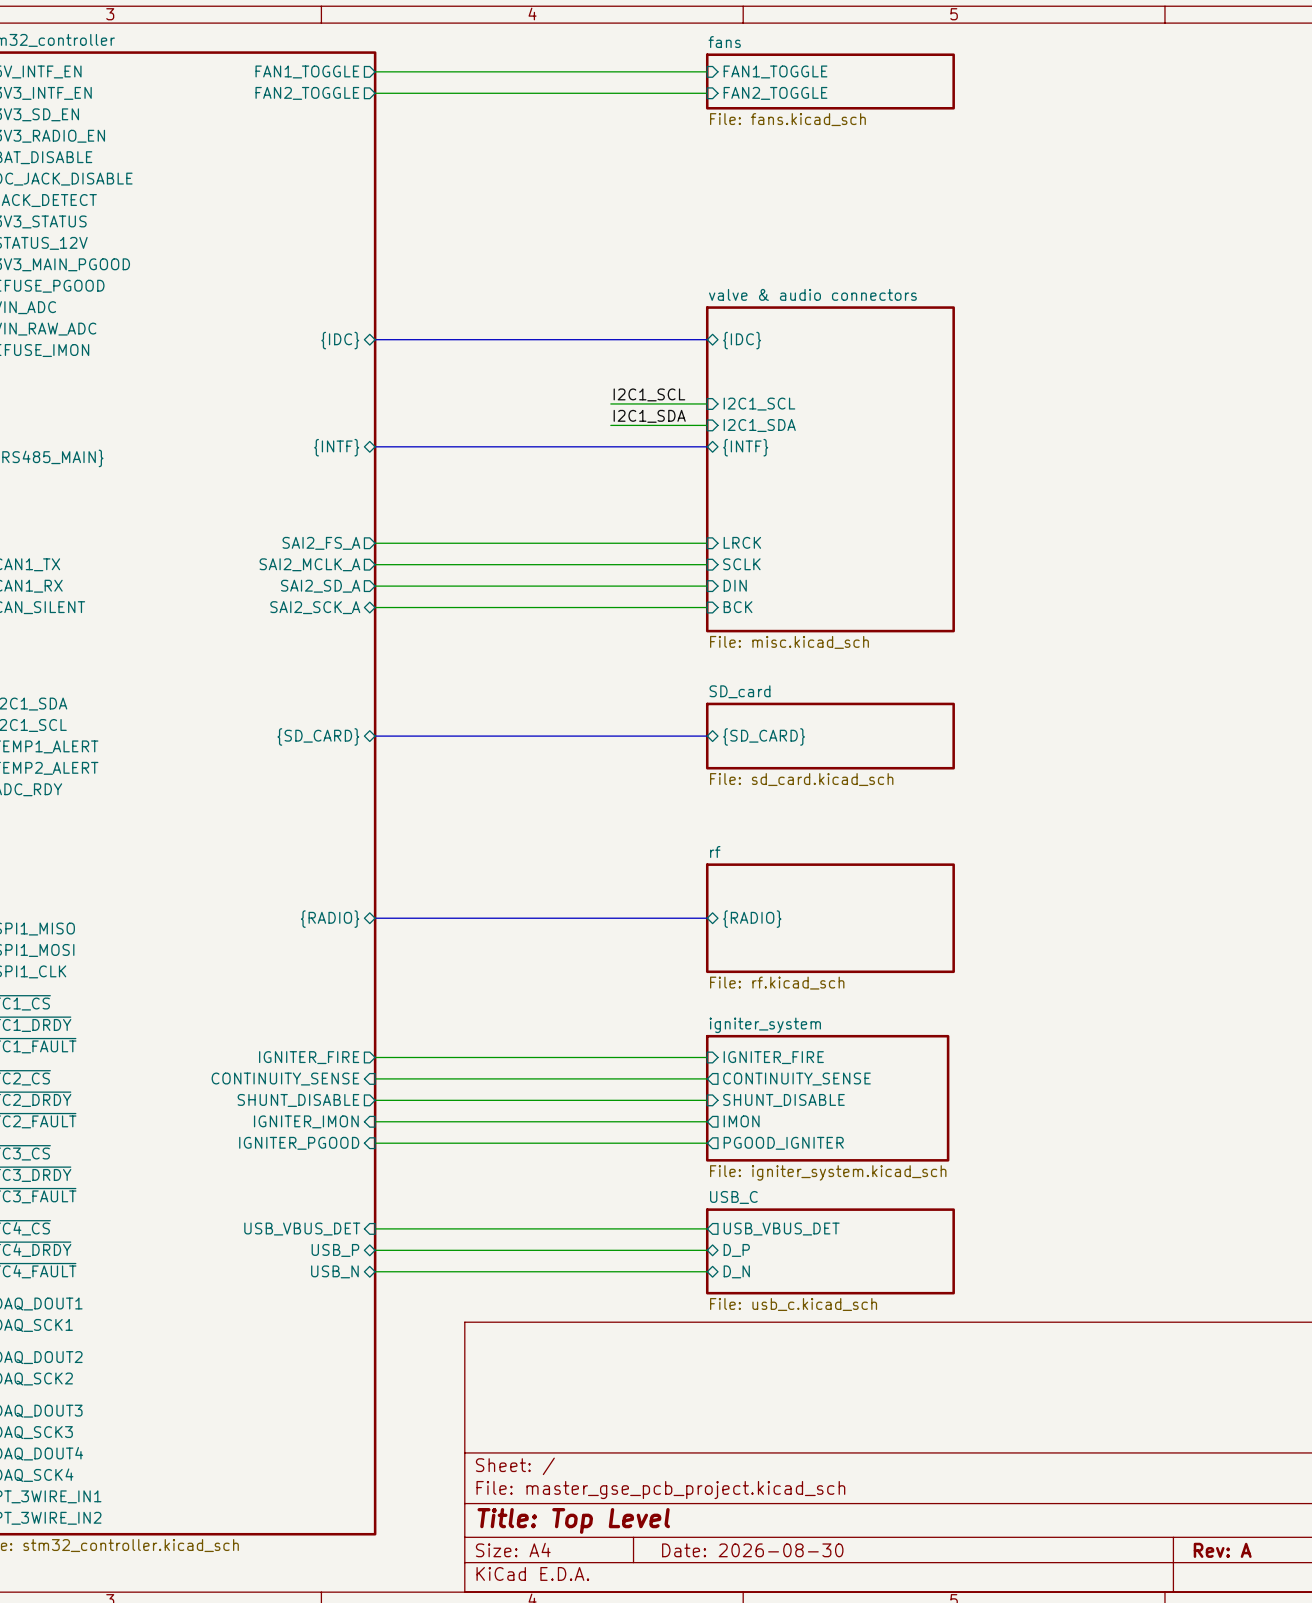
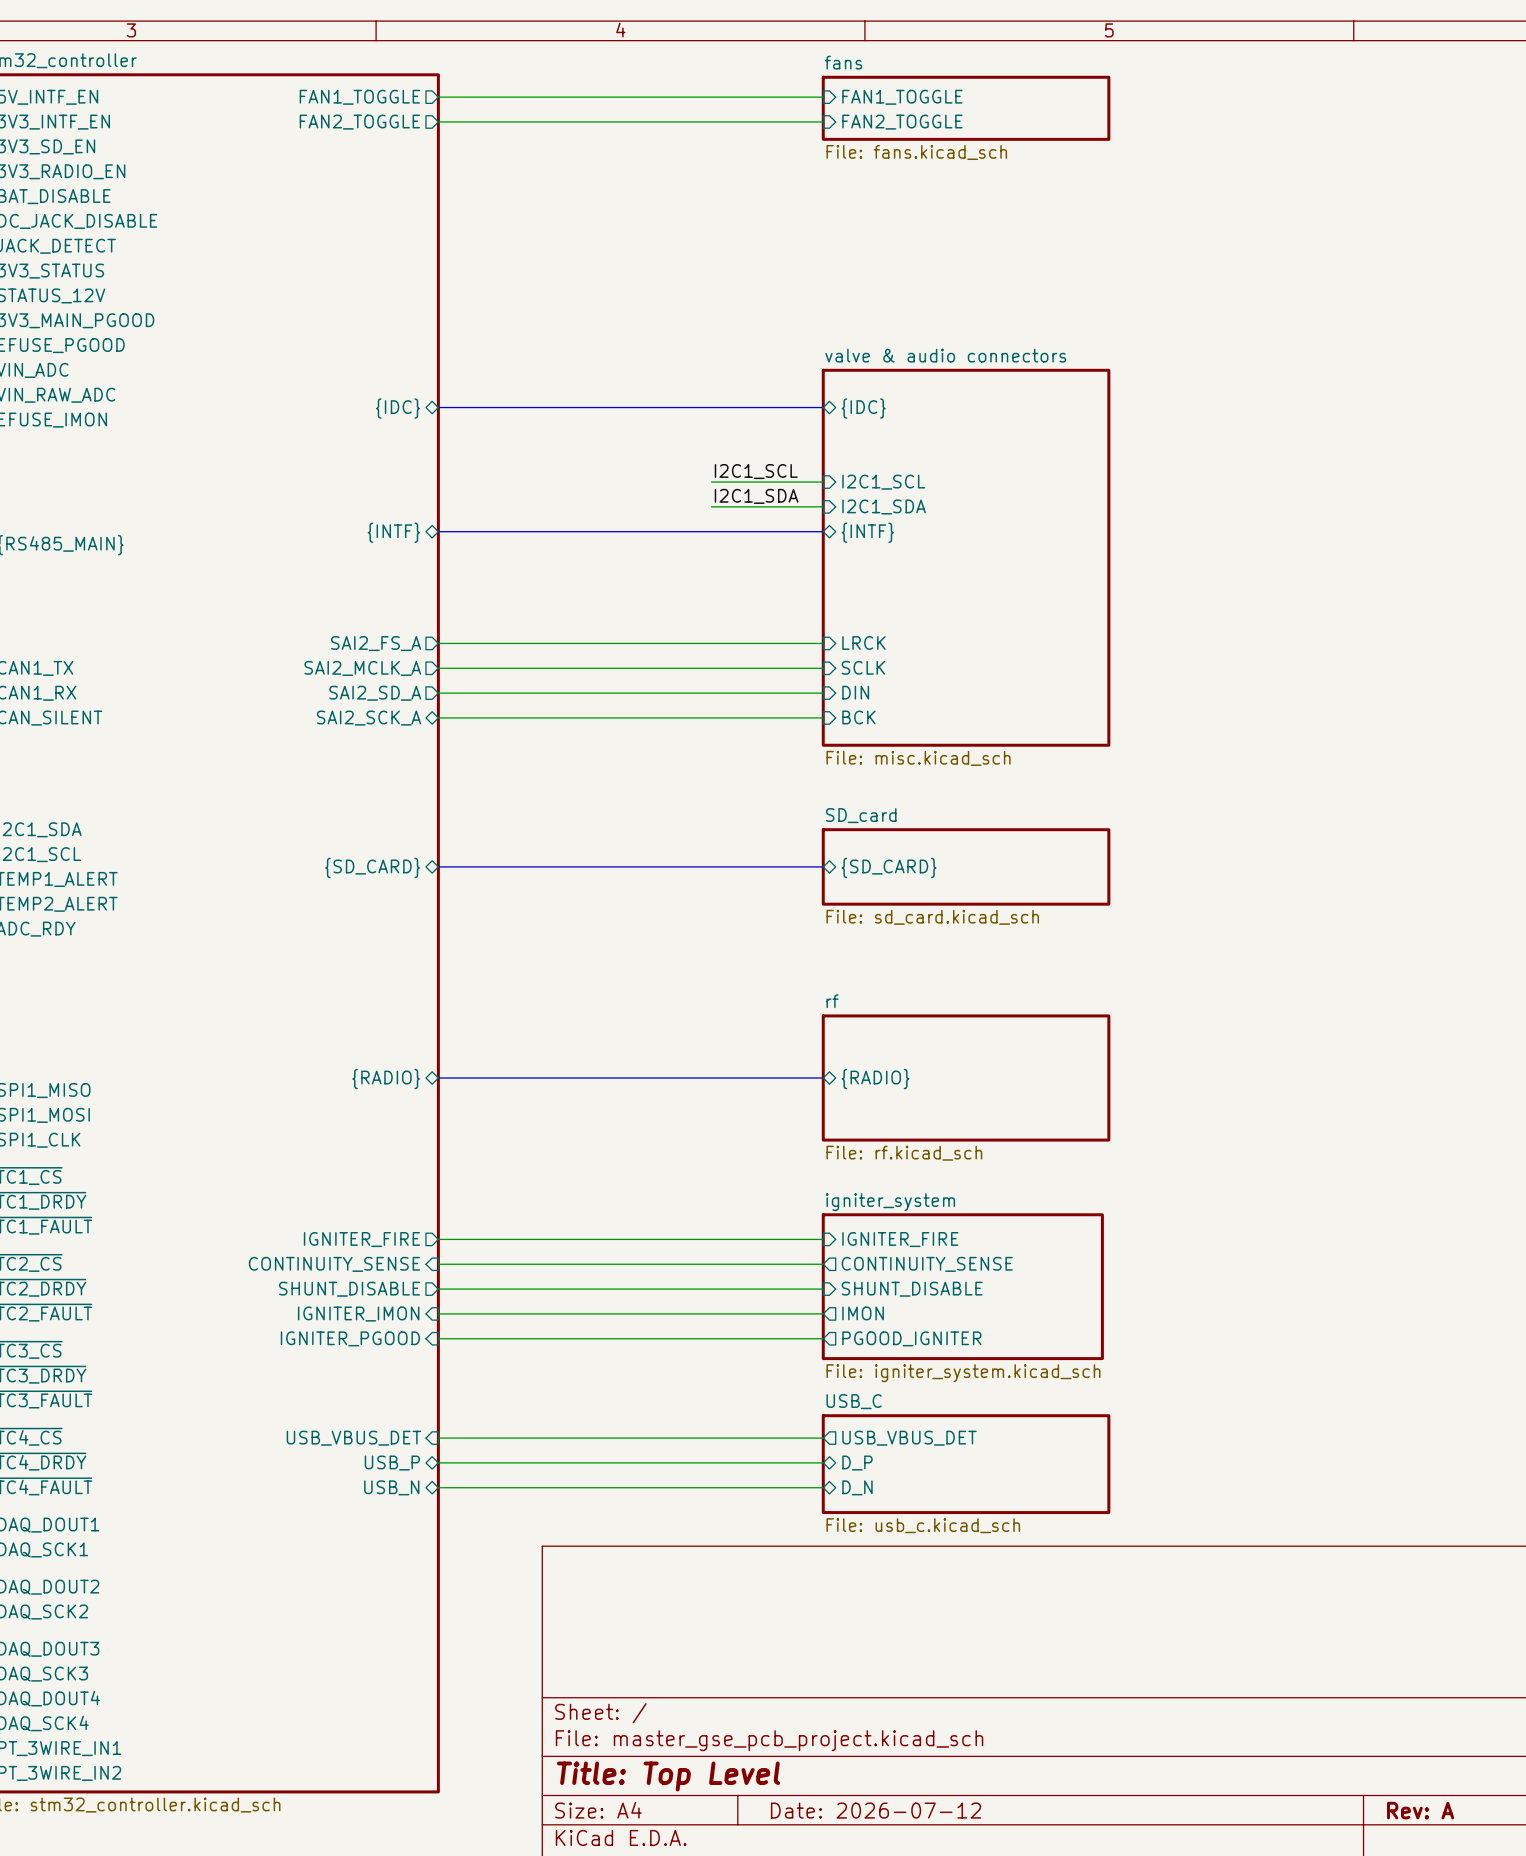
title block: Date: 2026-08-30 (752, 1550) -> Date: 2026-07-12 (876, 1810)

